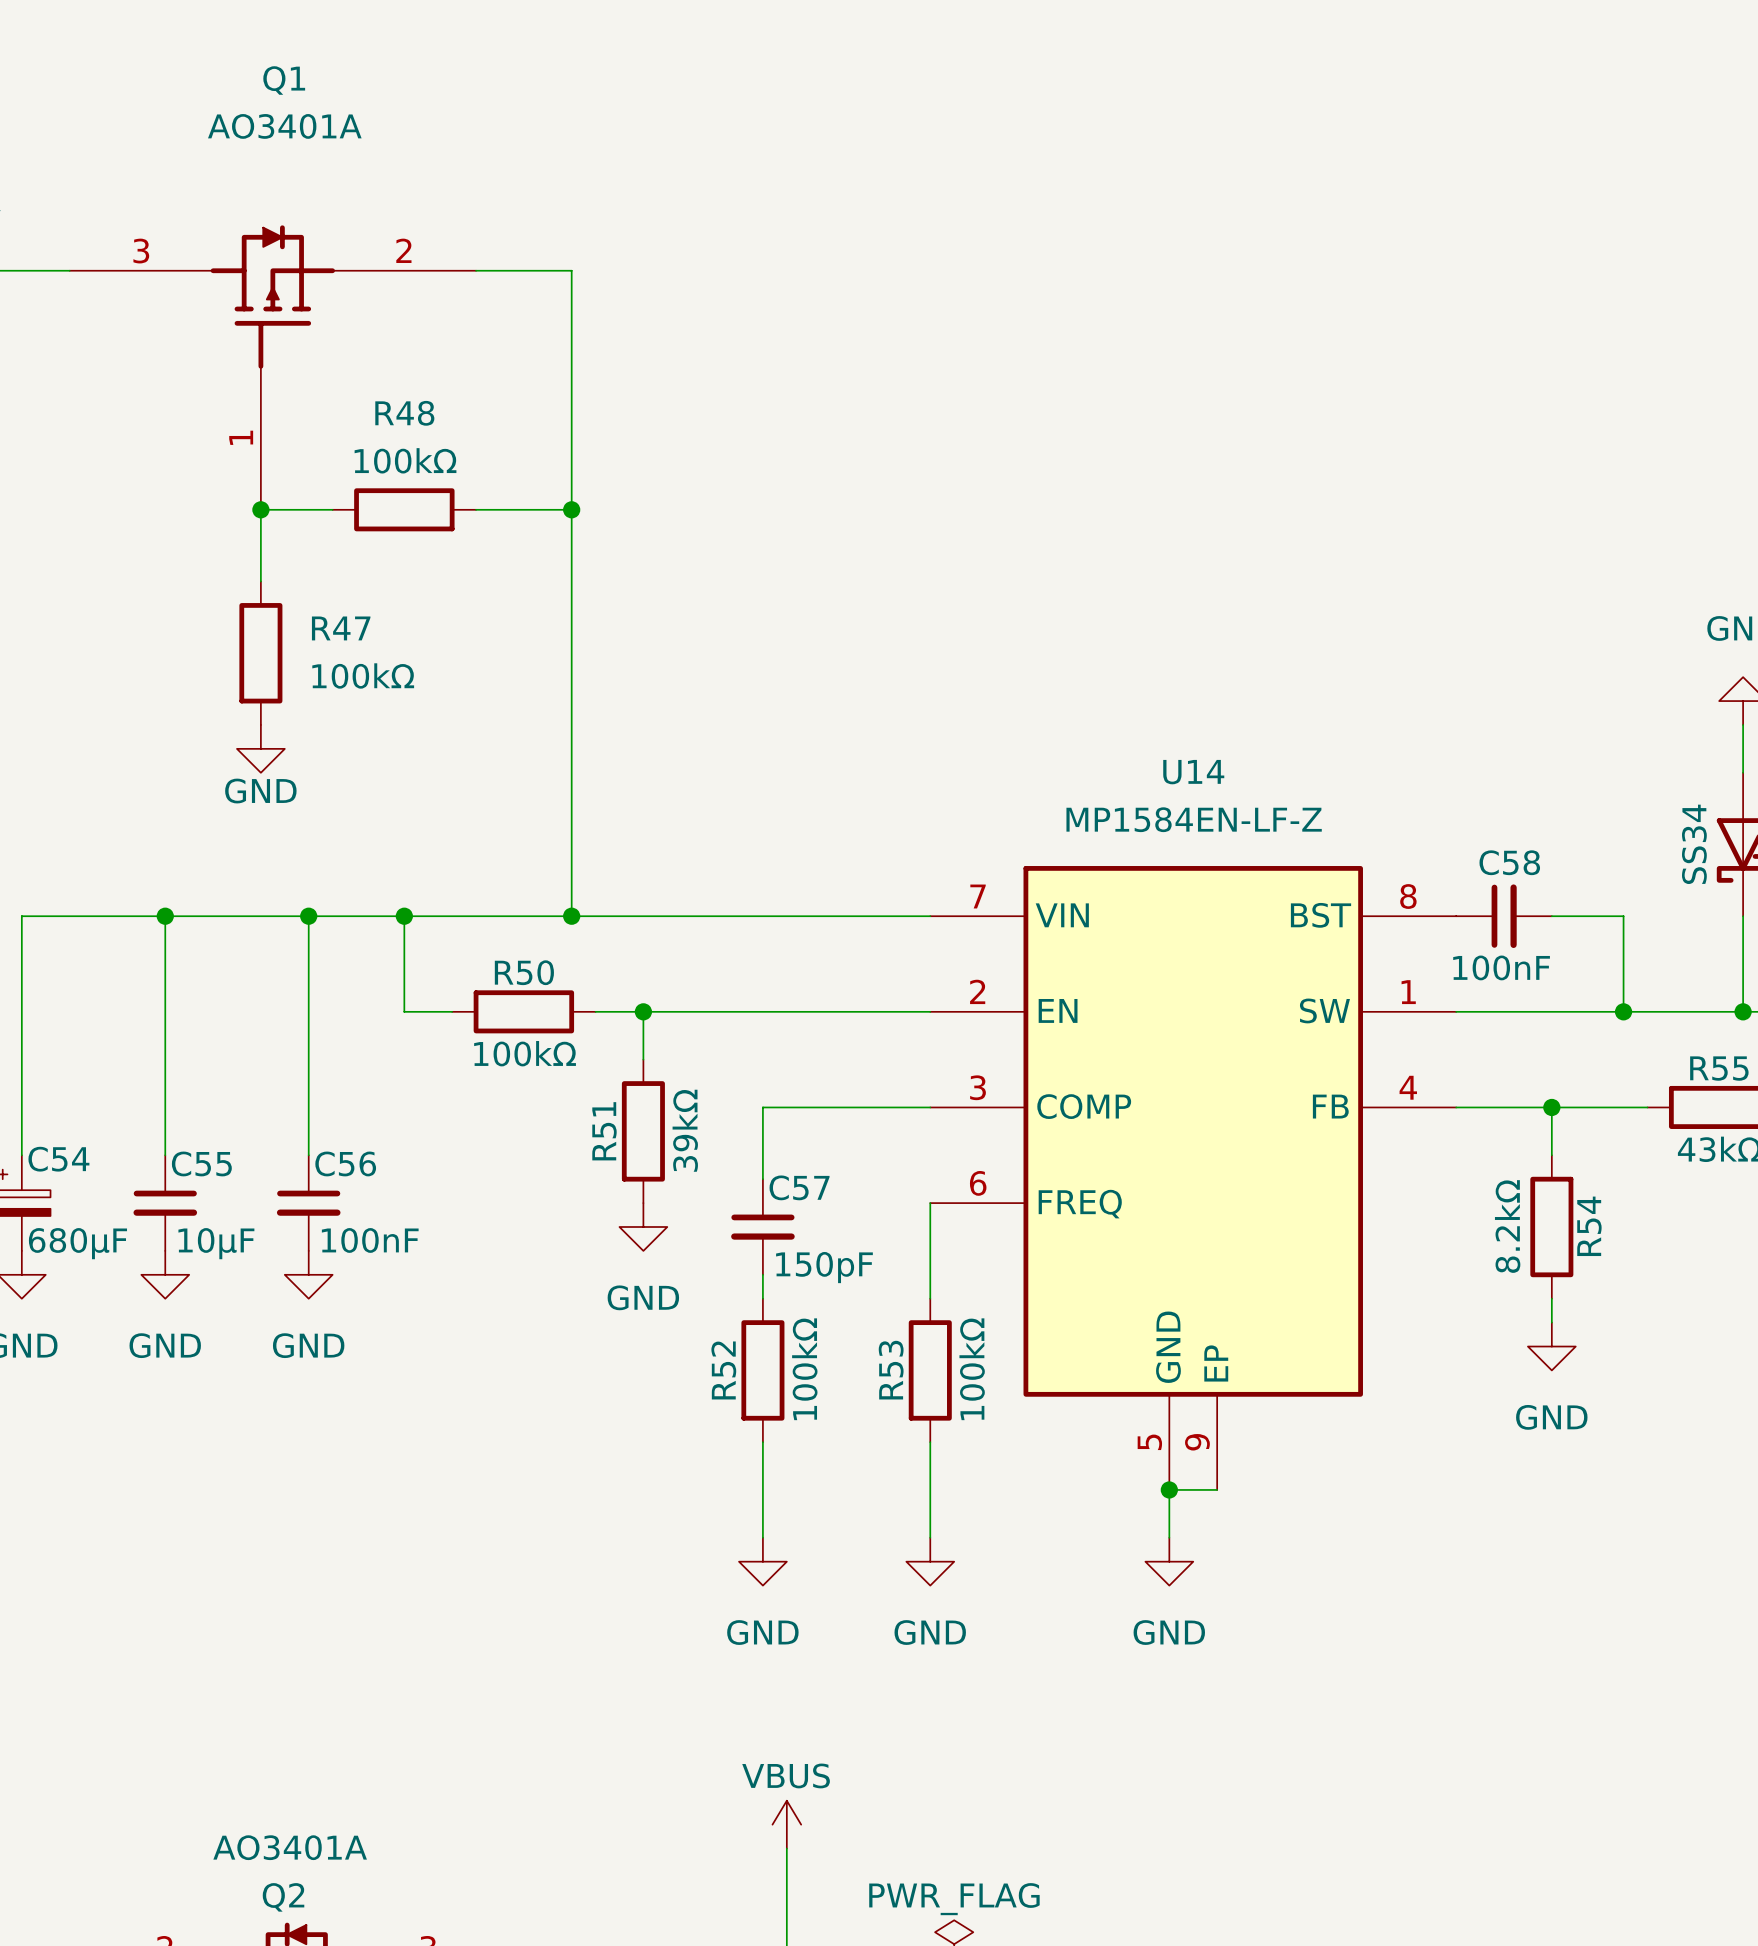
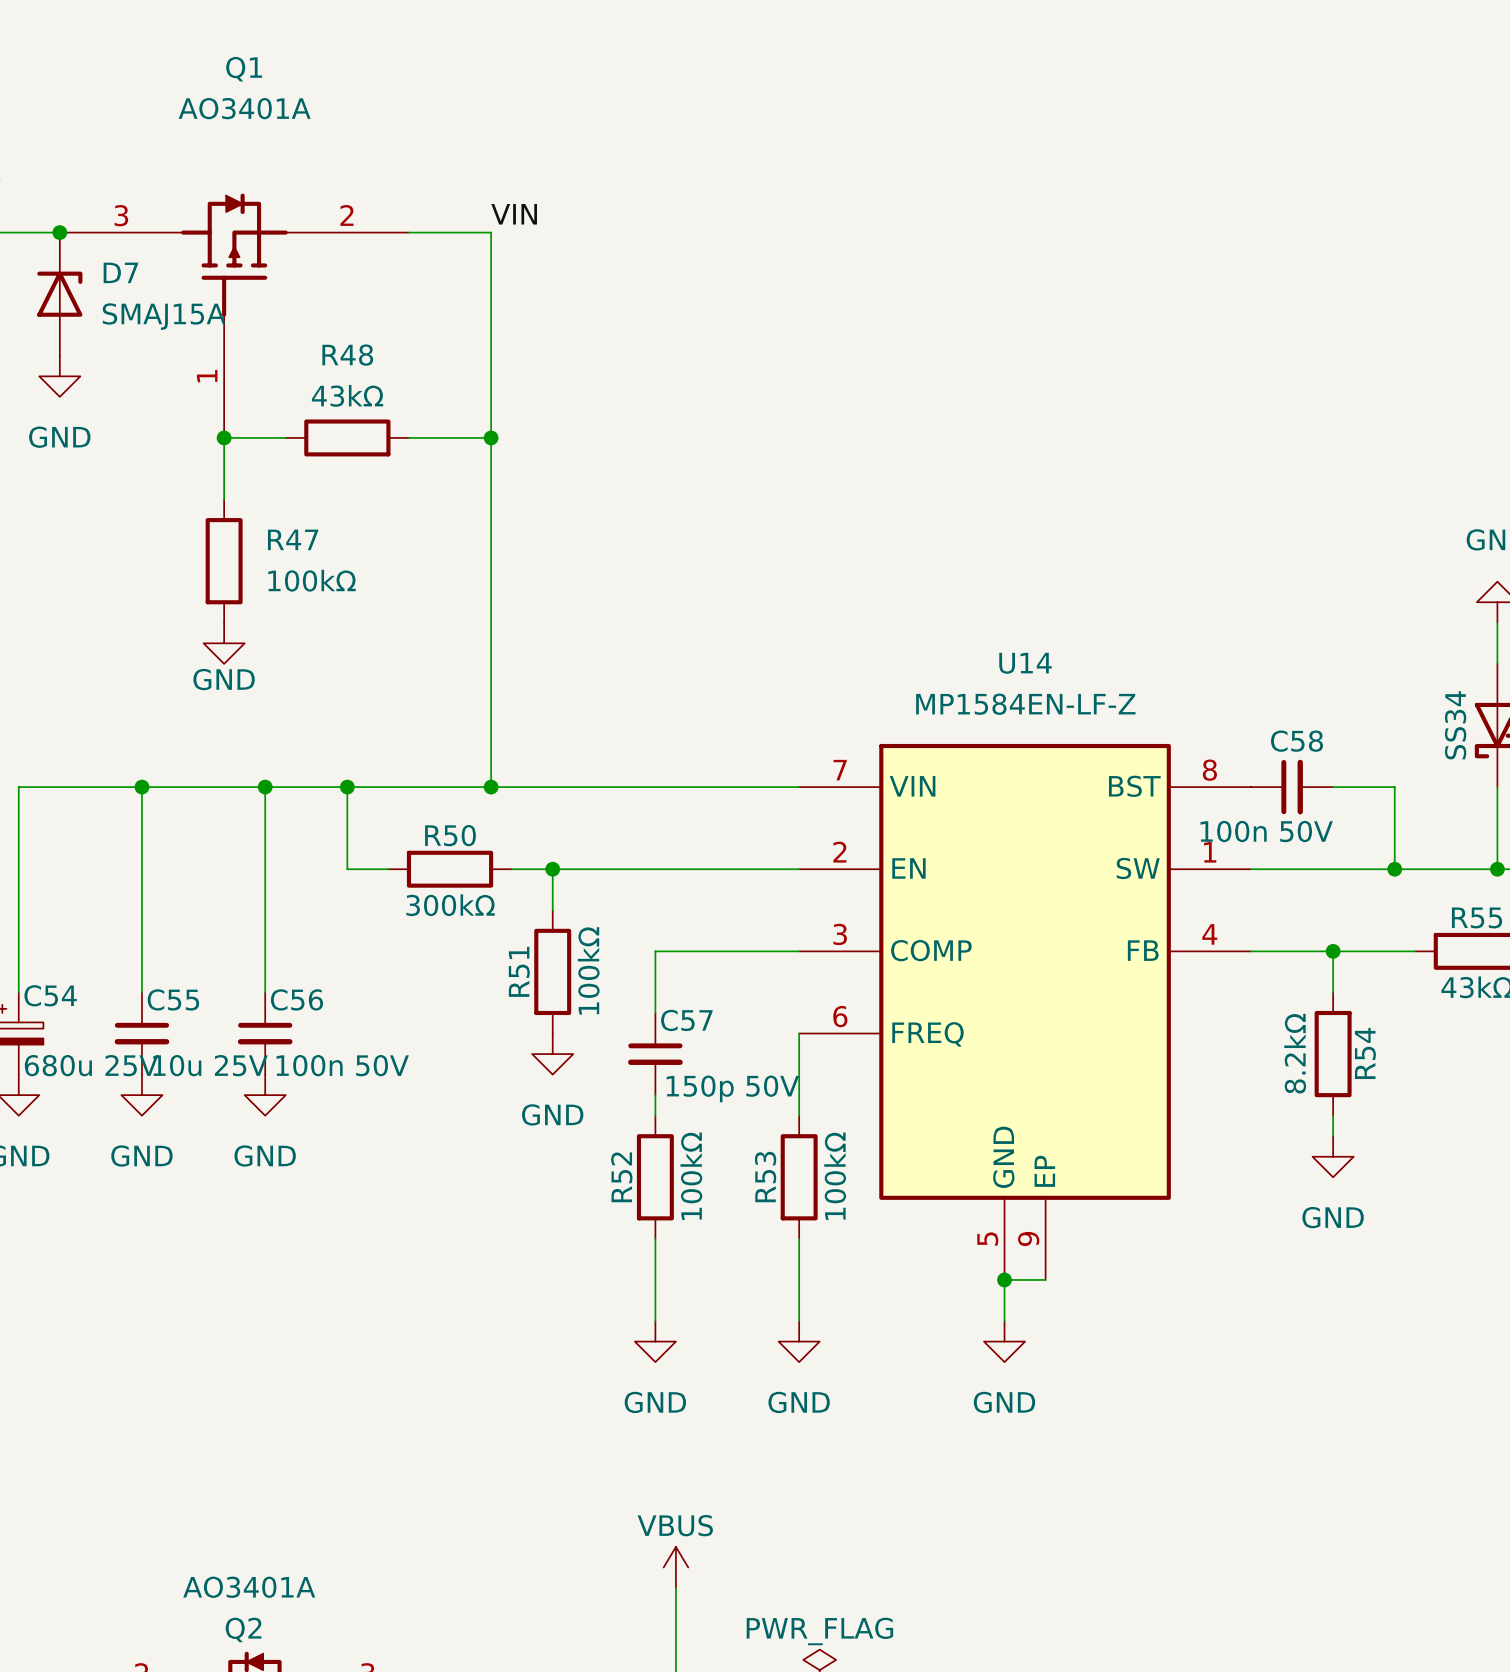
label: none -> VIN (514, 214)
junction: none -> (59, 232)
D7: none -> SMAJ15A (59, 294)
power symbol: none -> GND (59, 376)
R48 value: 100kΩ (405, 460) -> 43kΩ (347, 395)
C58 value: 100nF (1501, 967) -> 100n 50V (1266, 831)
R50 value: 100kΩ (525, 1053) -> 300kΩ (450, 905)
R51 value: 39kΩ (685, 1130) -> 100kΩ (588, 970)
C56 value: 100nF (370, 1240) -> 100n 50V (342, 1065)
C54 value: 680µF (77, 1243) -> 680u 25V (91, 1065)
C55 value: 10µF (216, 1243) -> 10u 25V (210, 1065)
C57 value: 150pF (824, 1267) -> 150p 50V (732, 1088)

